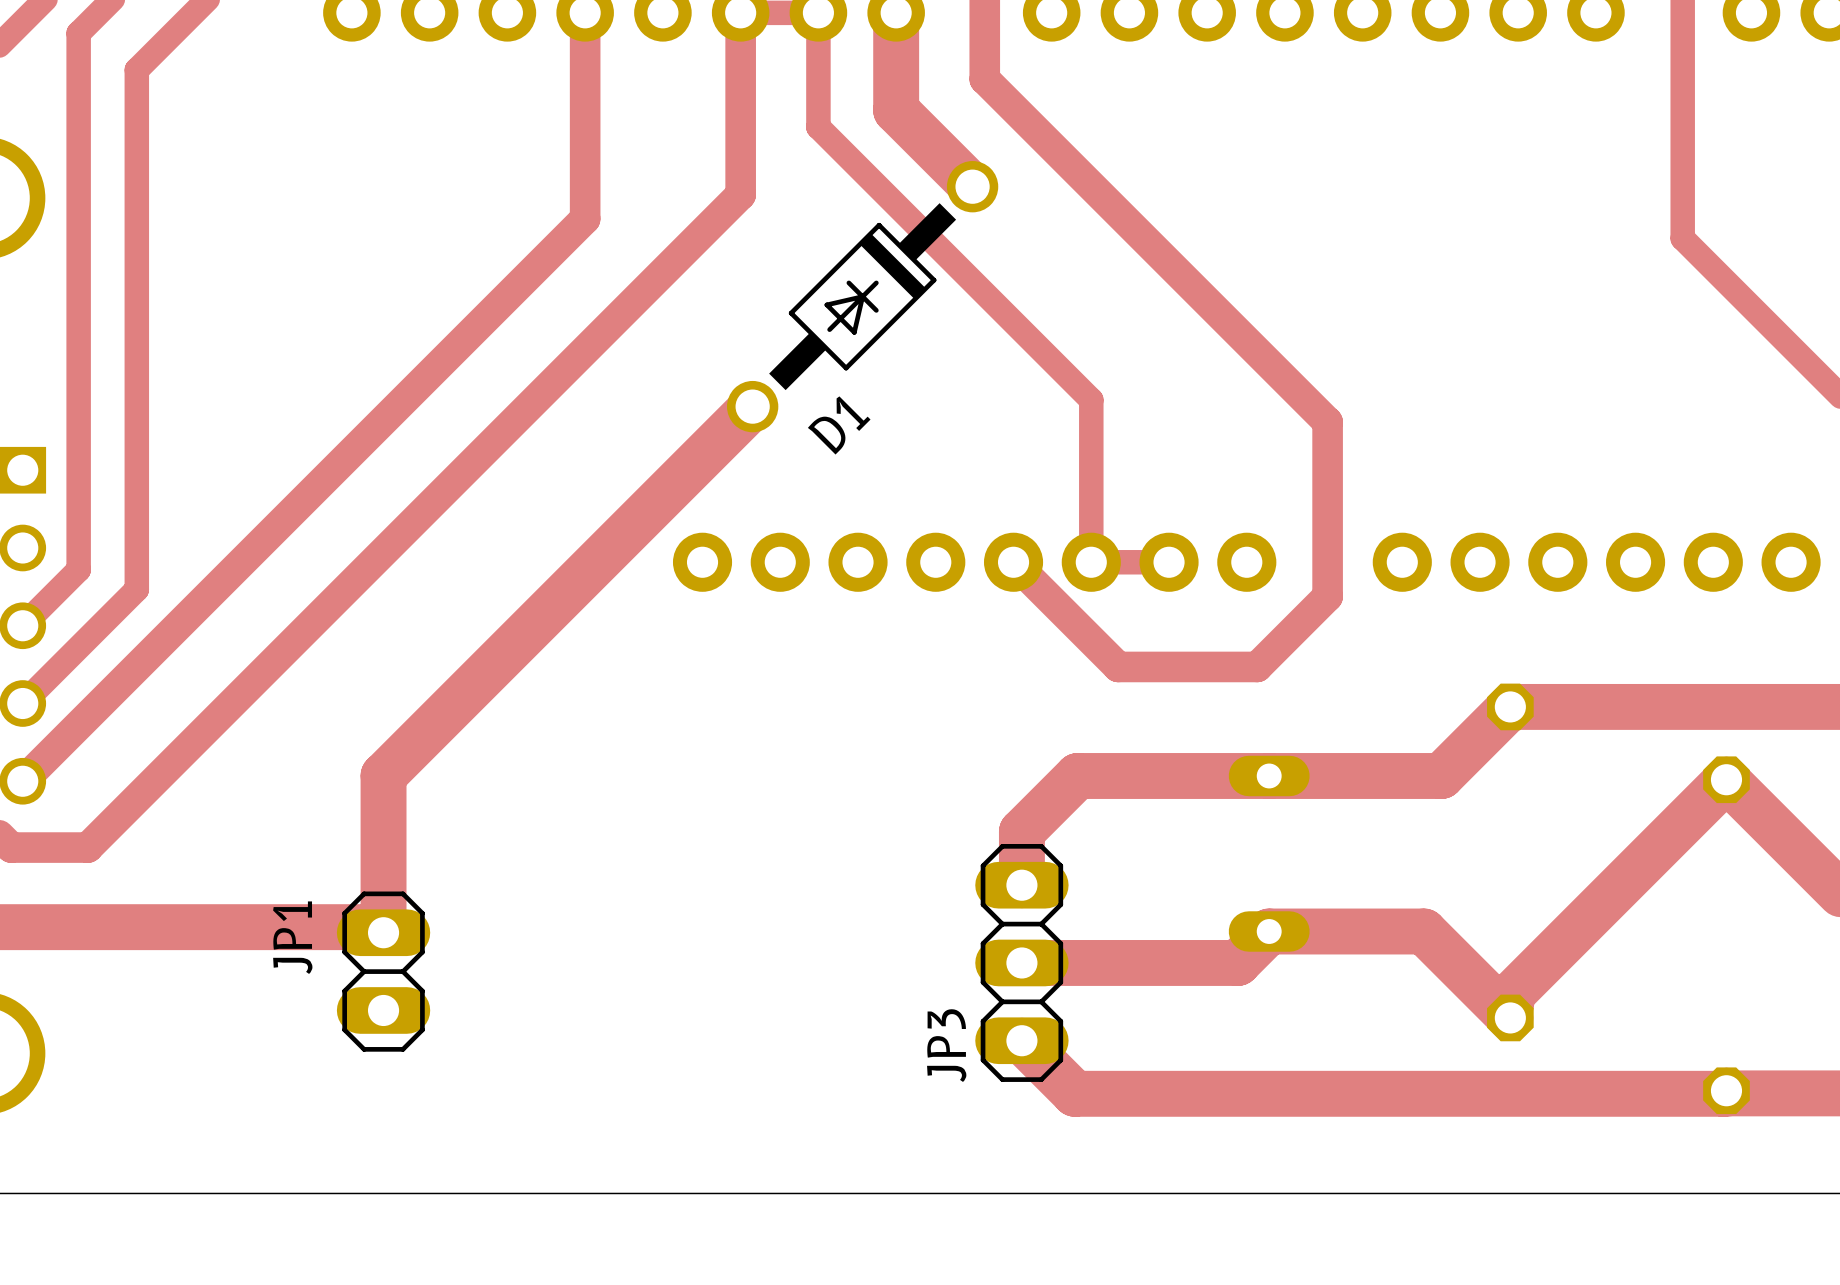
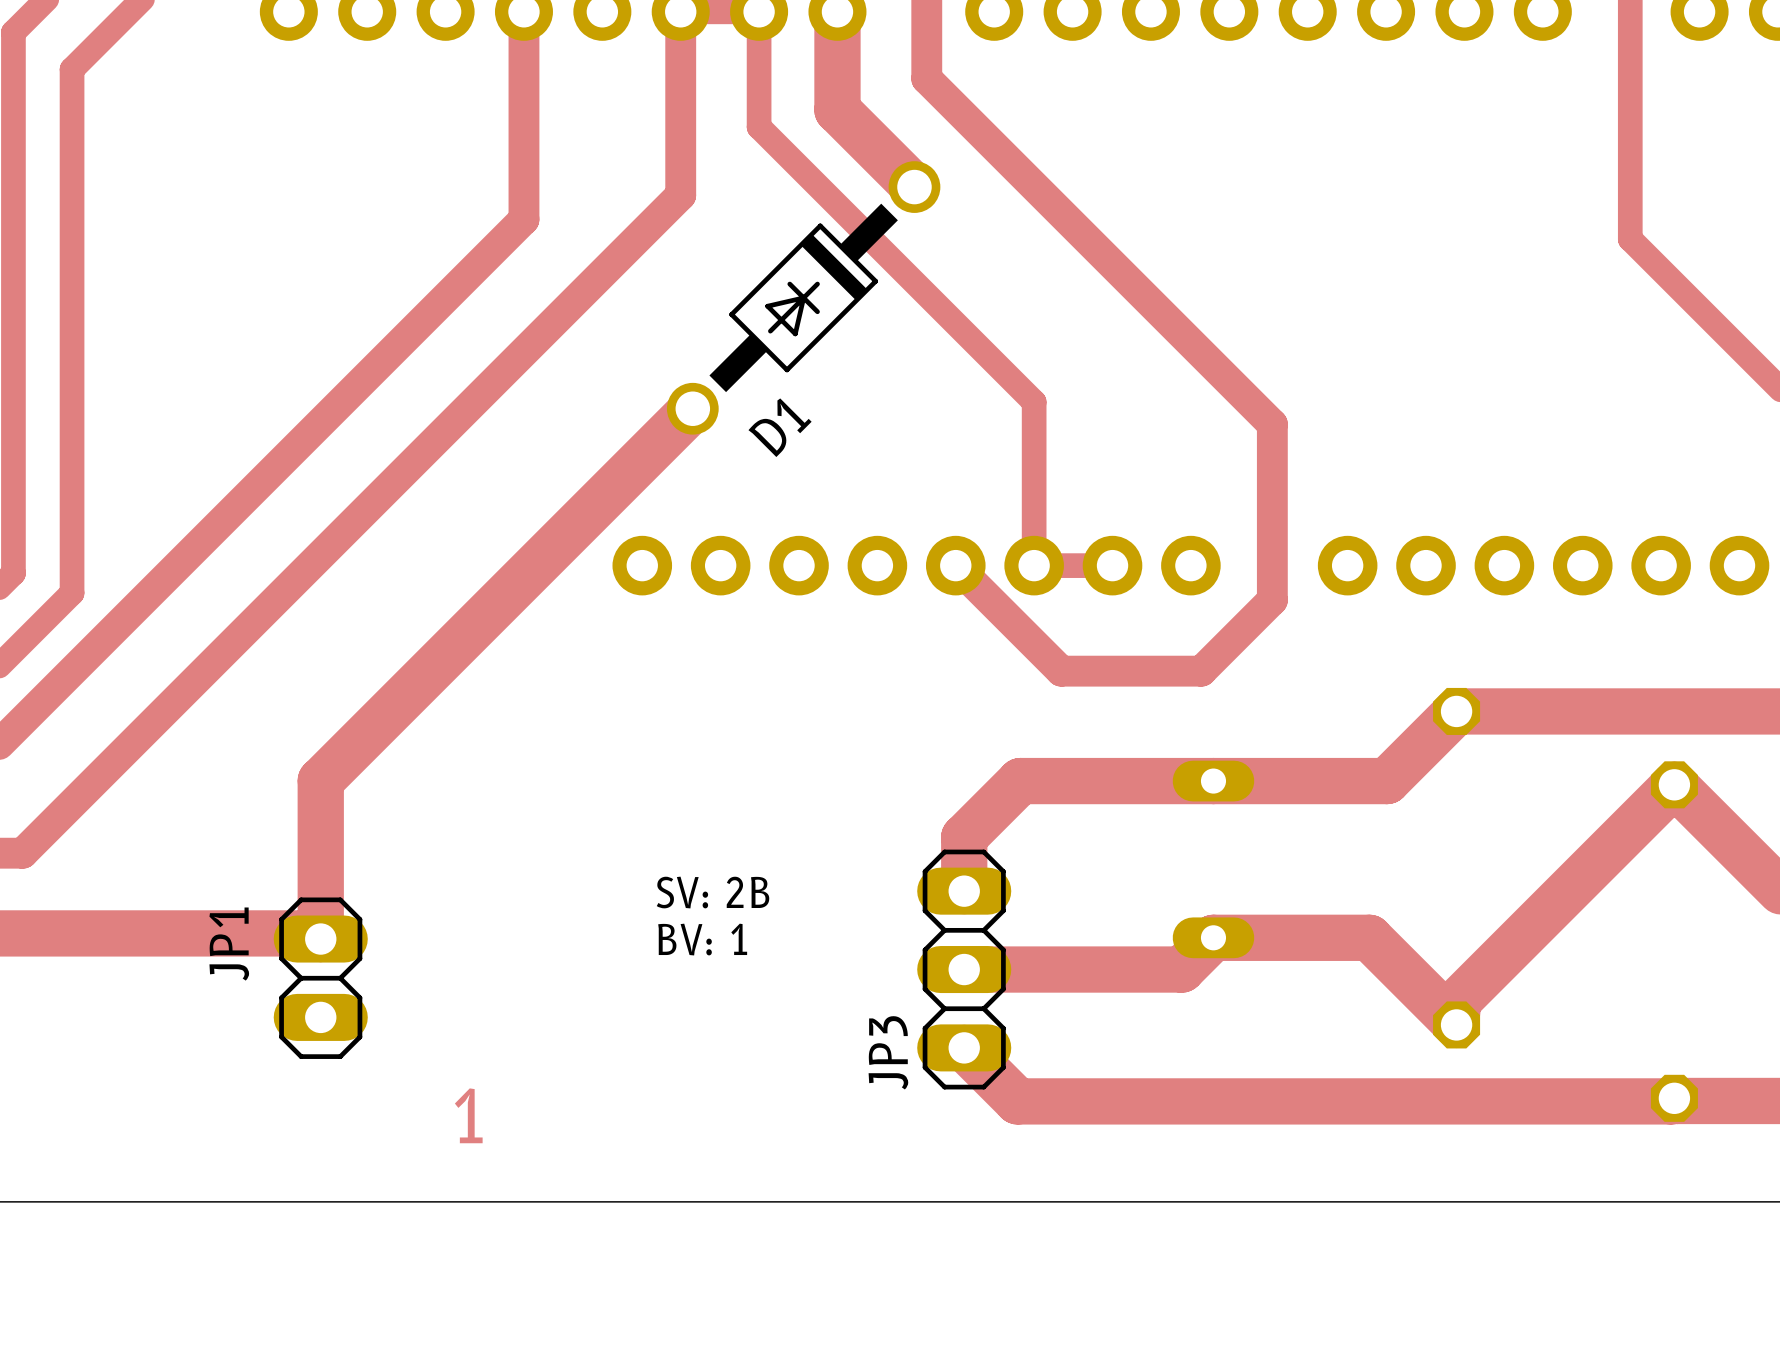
text: none -> SV: 2B (713, 892)
text: none -> BV: 1 (702, 939)
text: none -> 1 (468, 1115)

